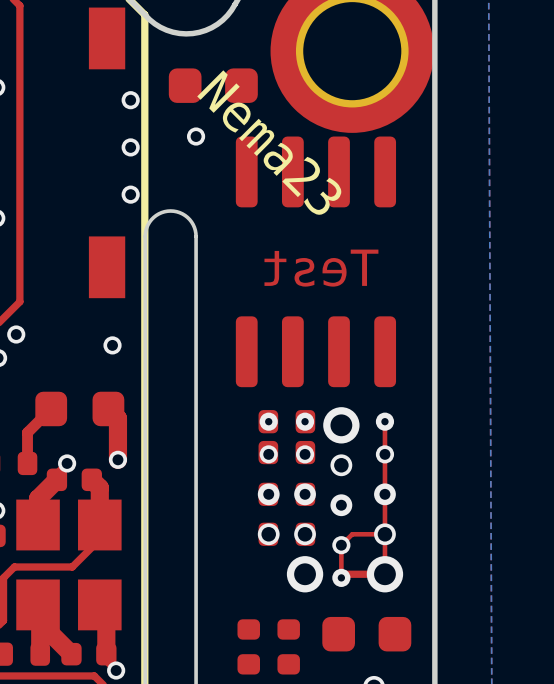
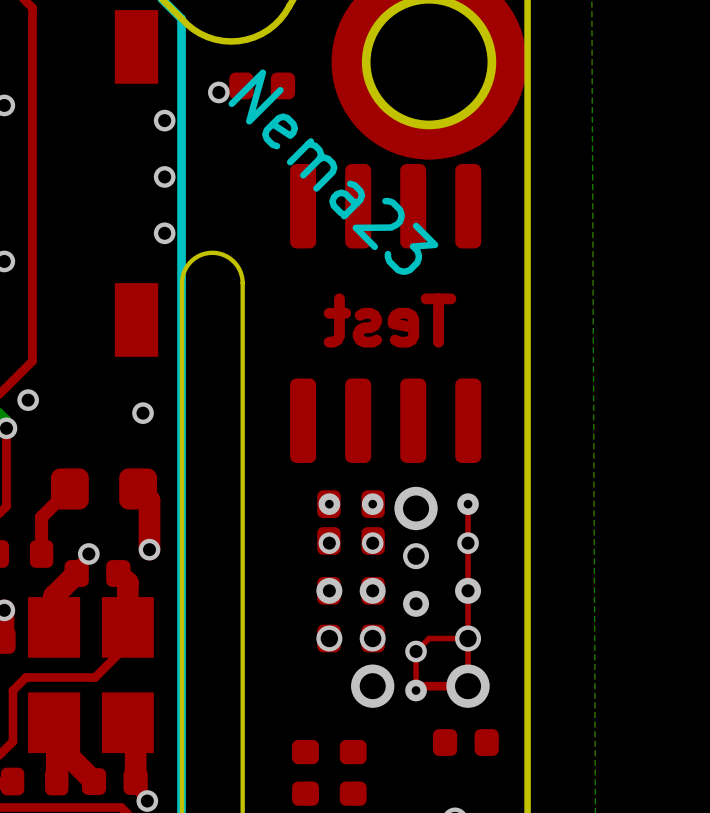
part footprint: [168, 68, 258, 103] -> [229, 72, 296, 100]
via position: (196, 136) -> (218, 92)
part footprint: [322, 616, 412, 652] -> [432, 729, 499, 756]

